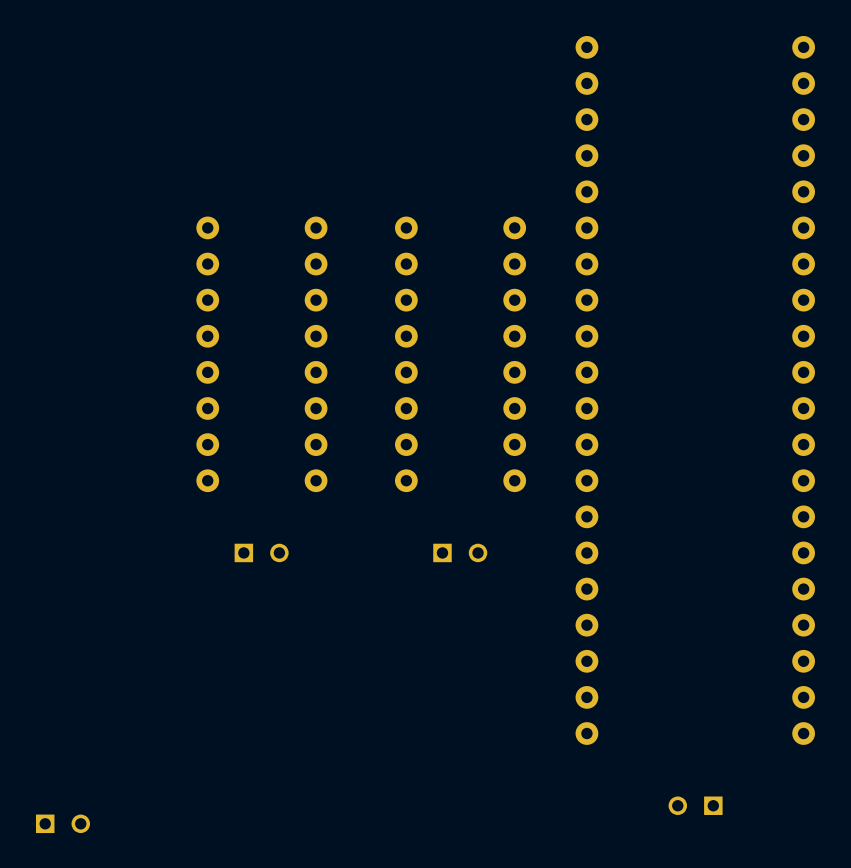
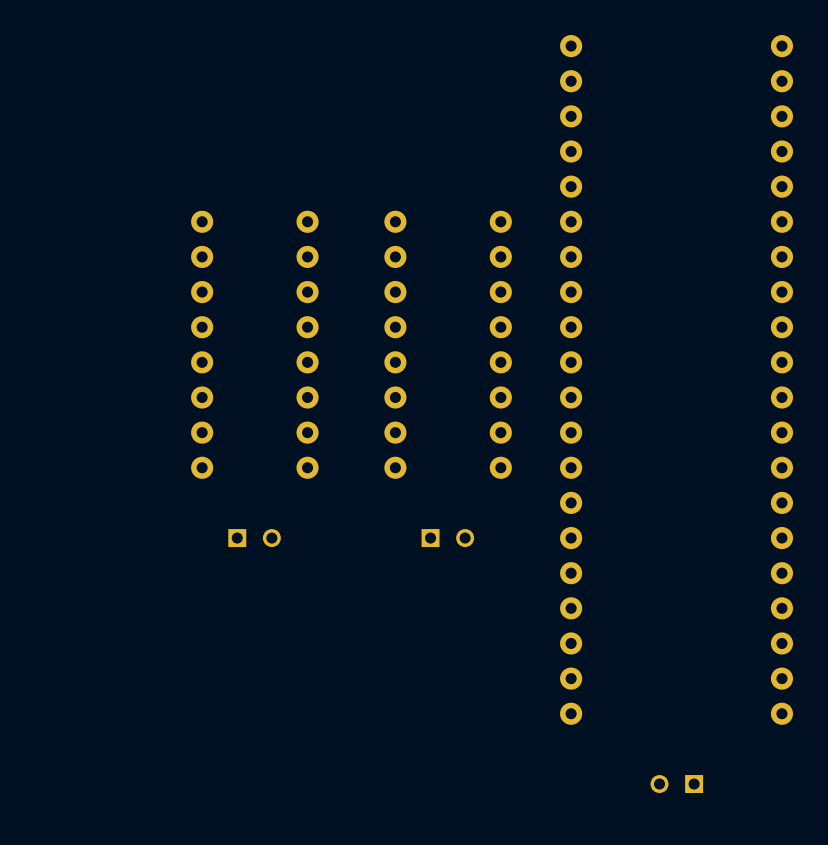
part: (62, 823) -> none

